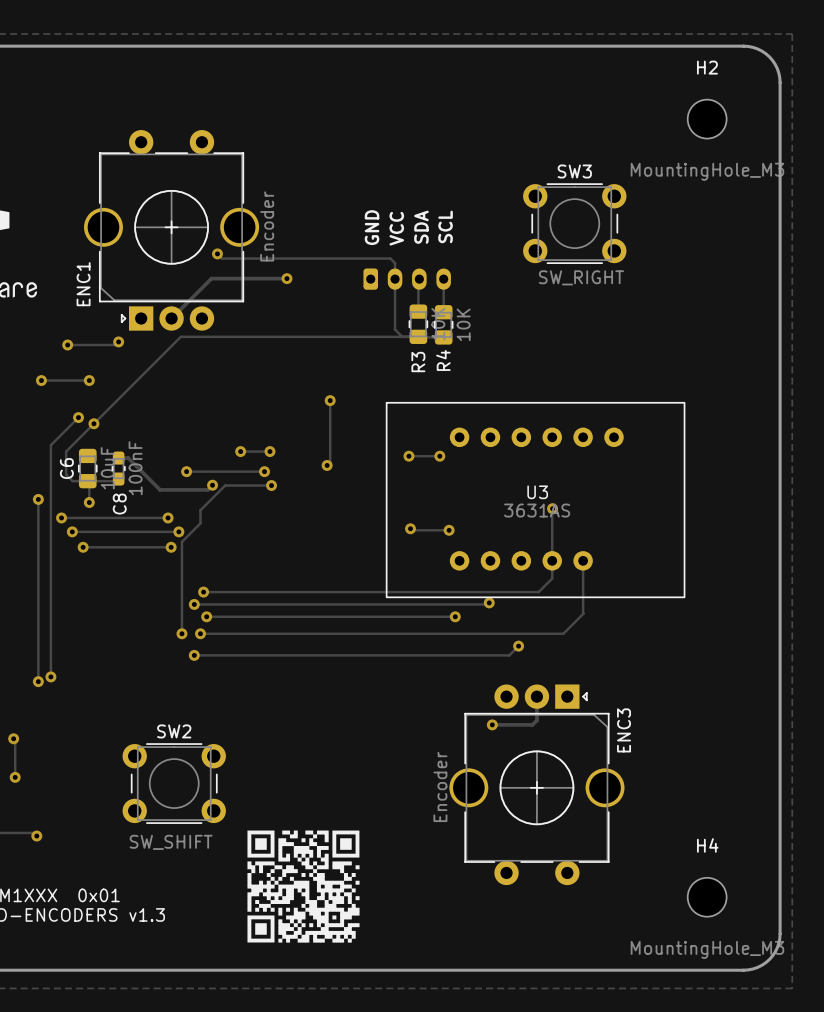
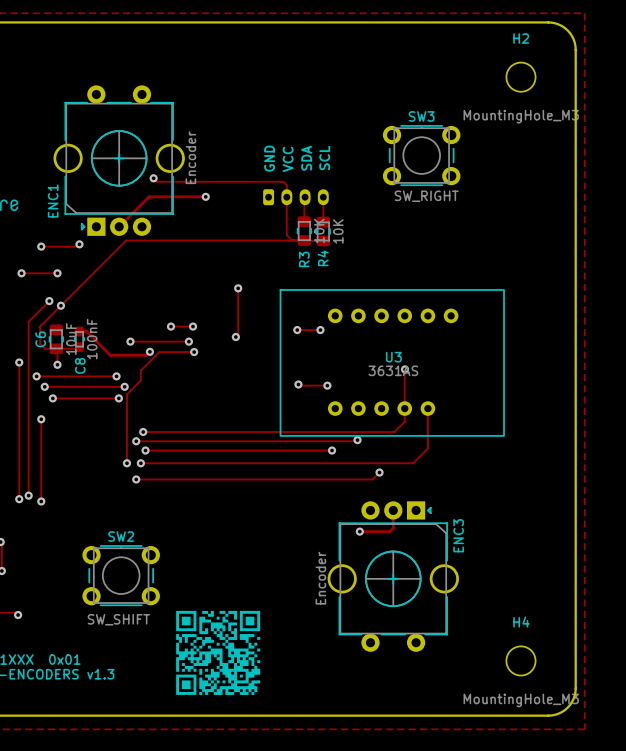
track: none -> (41, 419) (41, 501)
via: none -> (41, 419)
via: none -> (41, 501)

